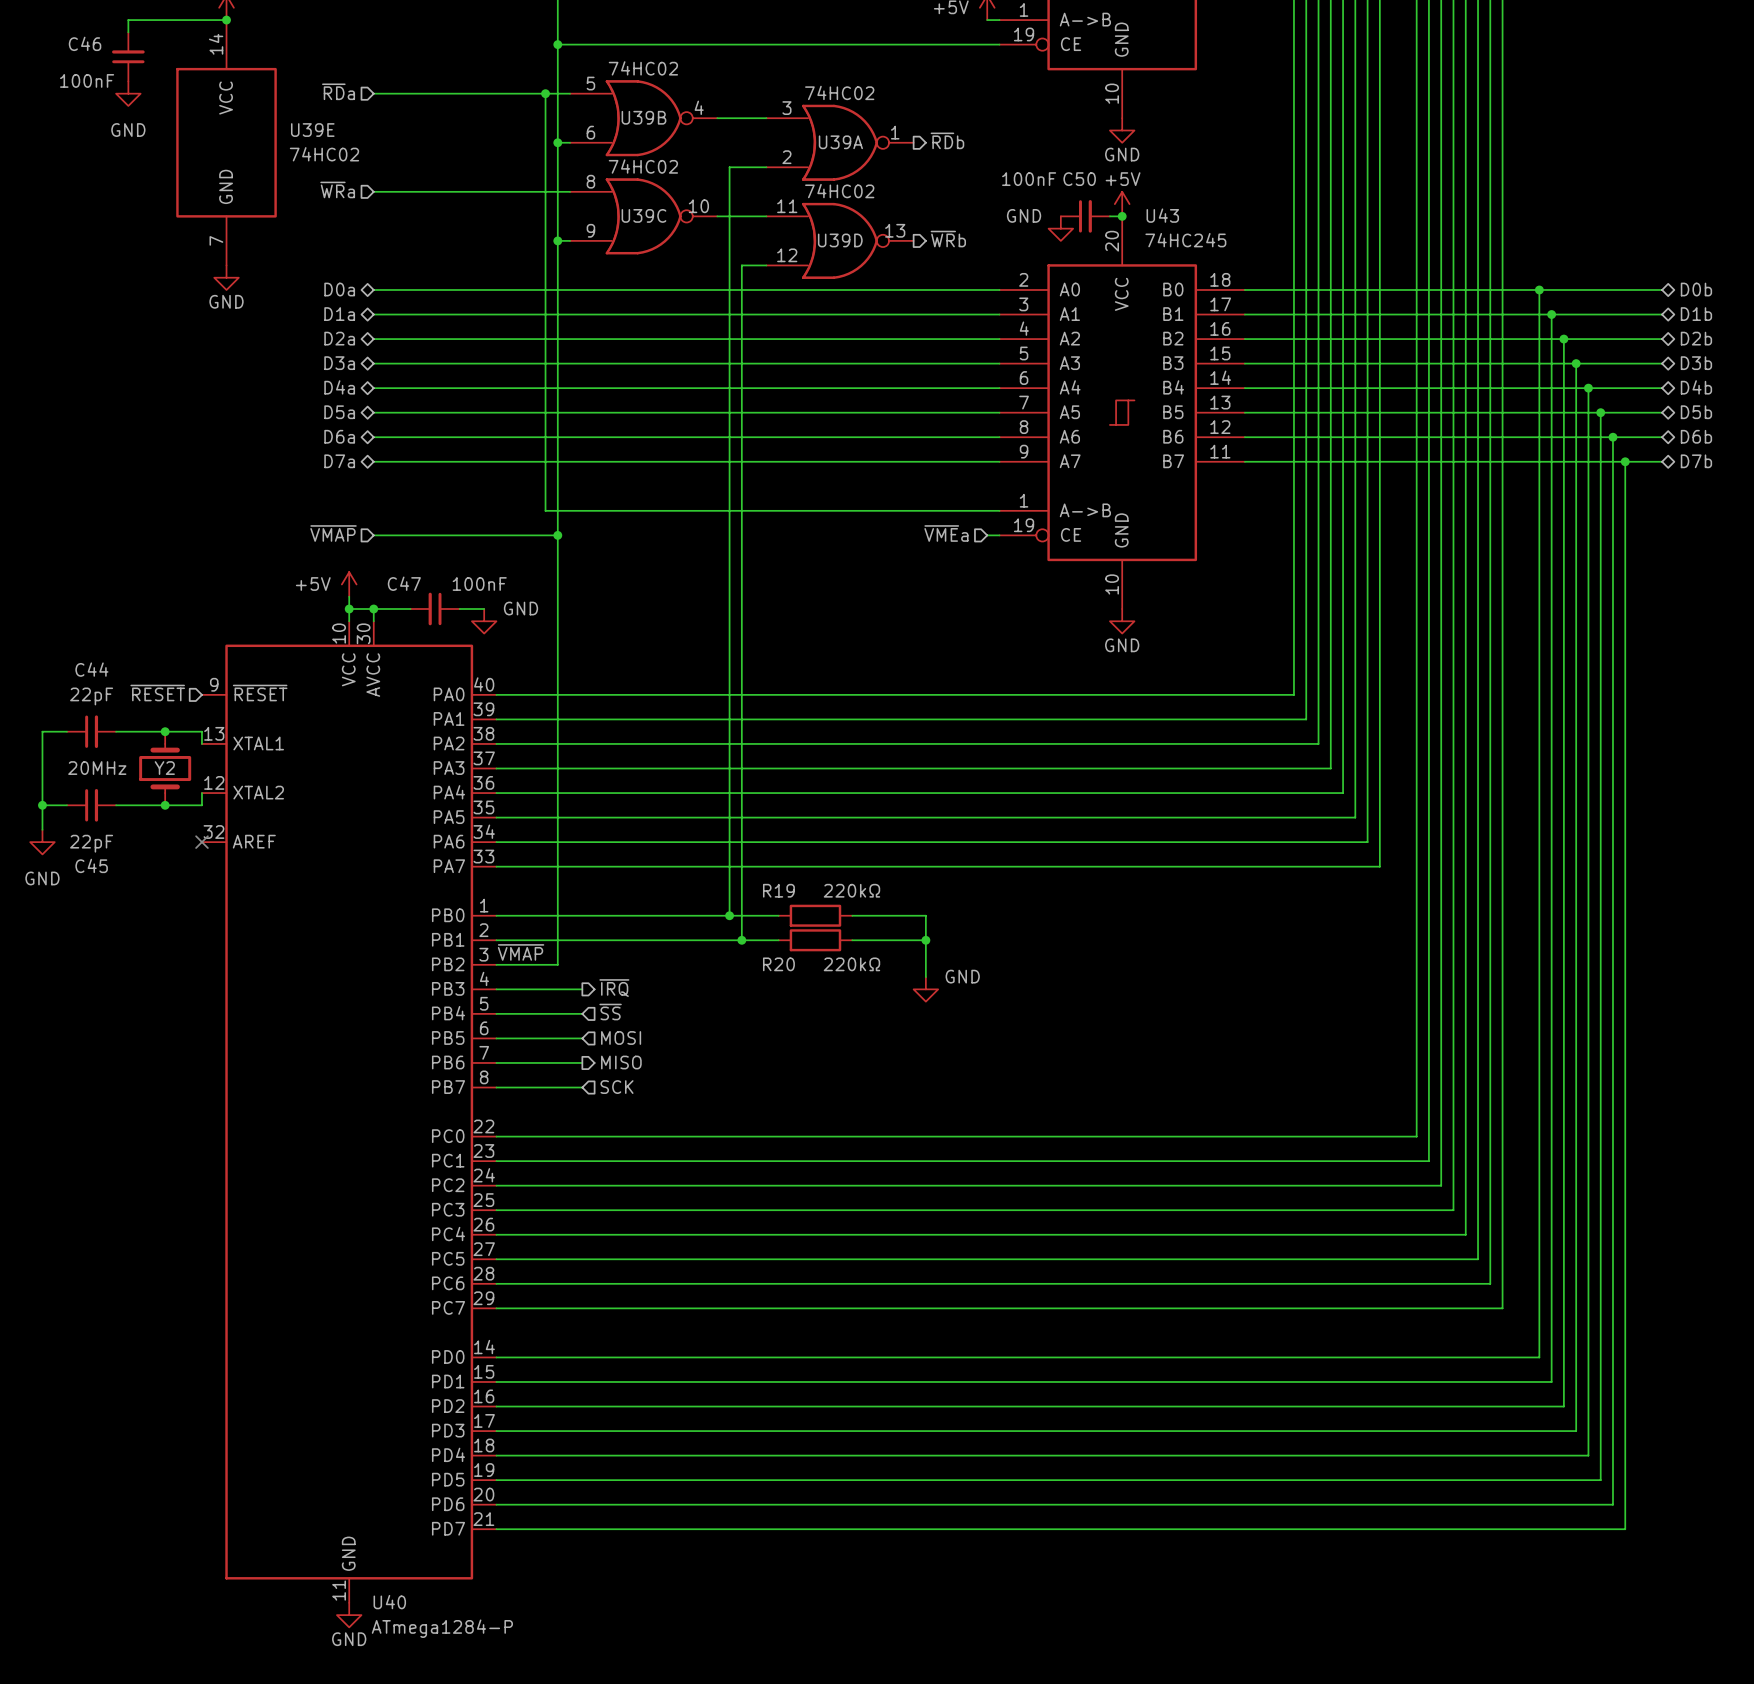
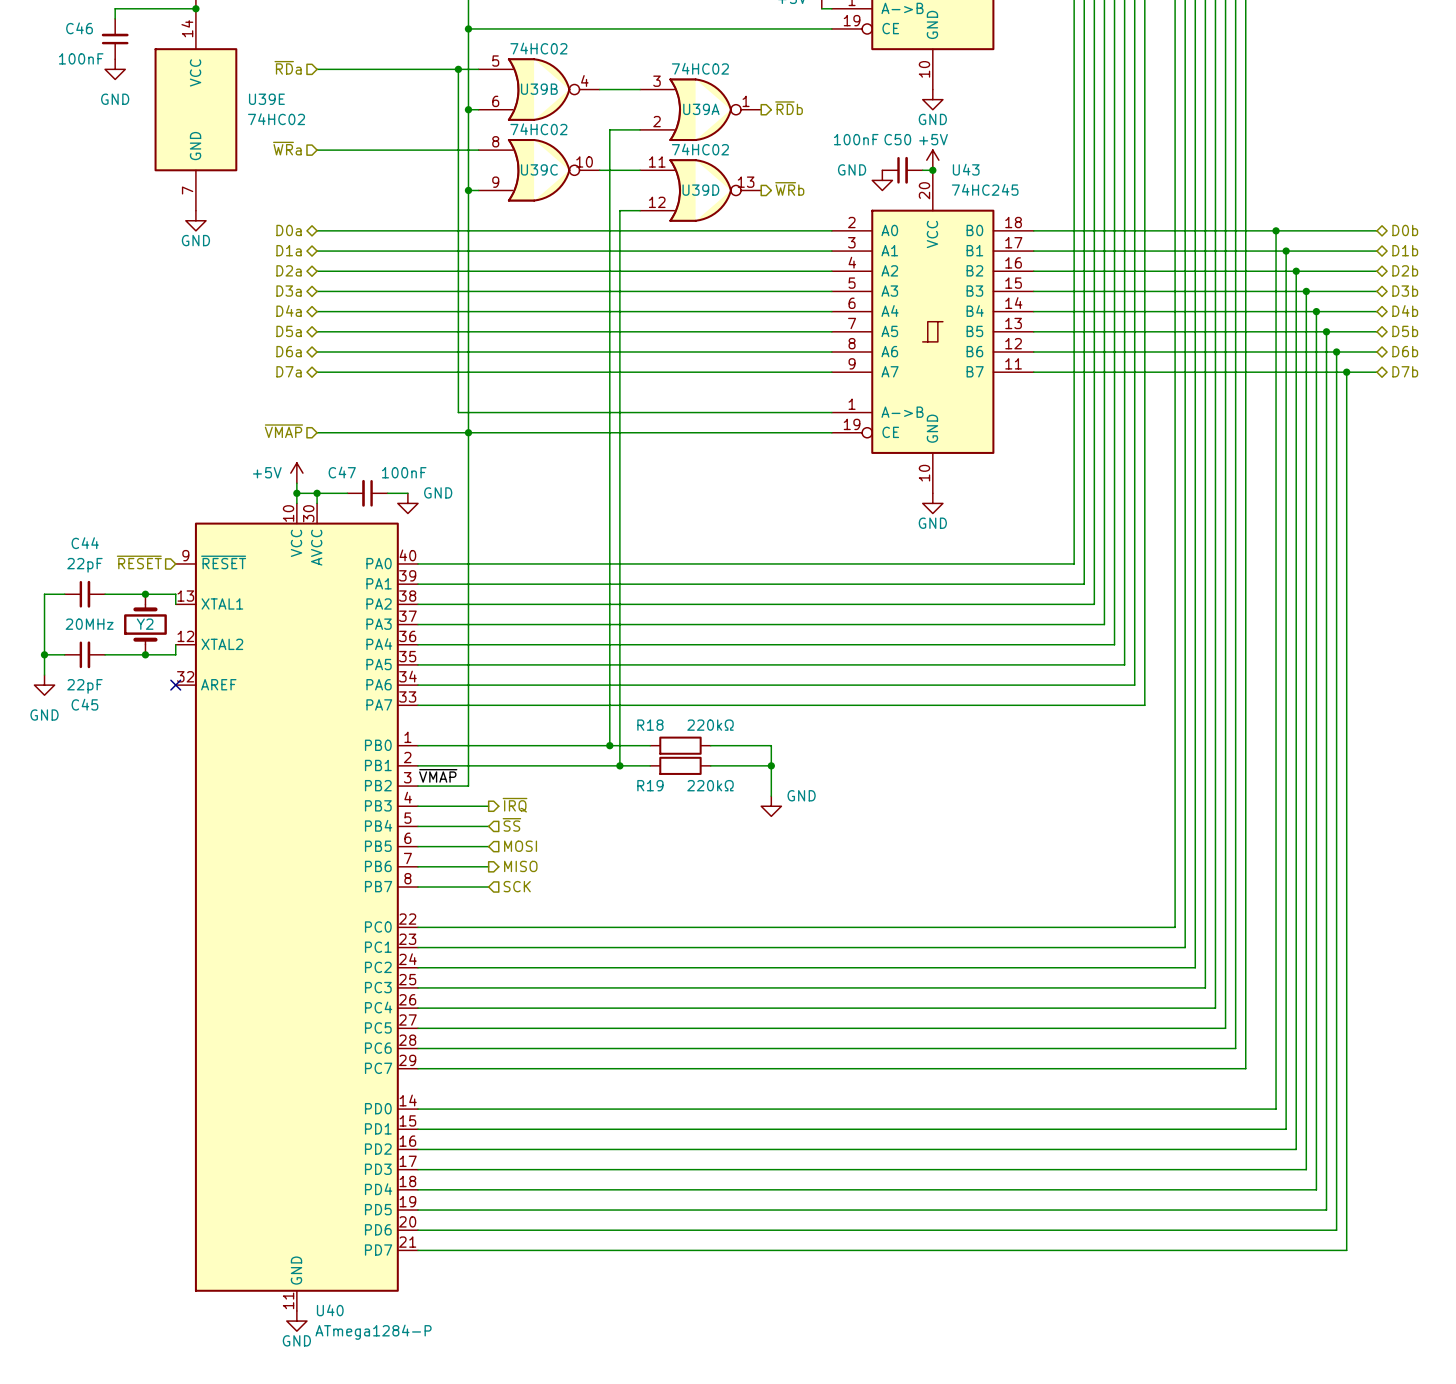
hierarchical label: ~{VME}a (946, 533) -> none
wire: none -> (468, 432) (821, 432)
R19 name: R19 (778, 890) -> R18 (650, 725)
R20 name: R20 (778, 964) -> R19 (650, 785)

